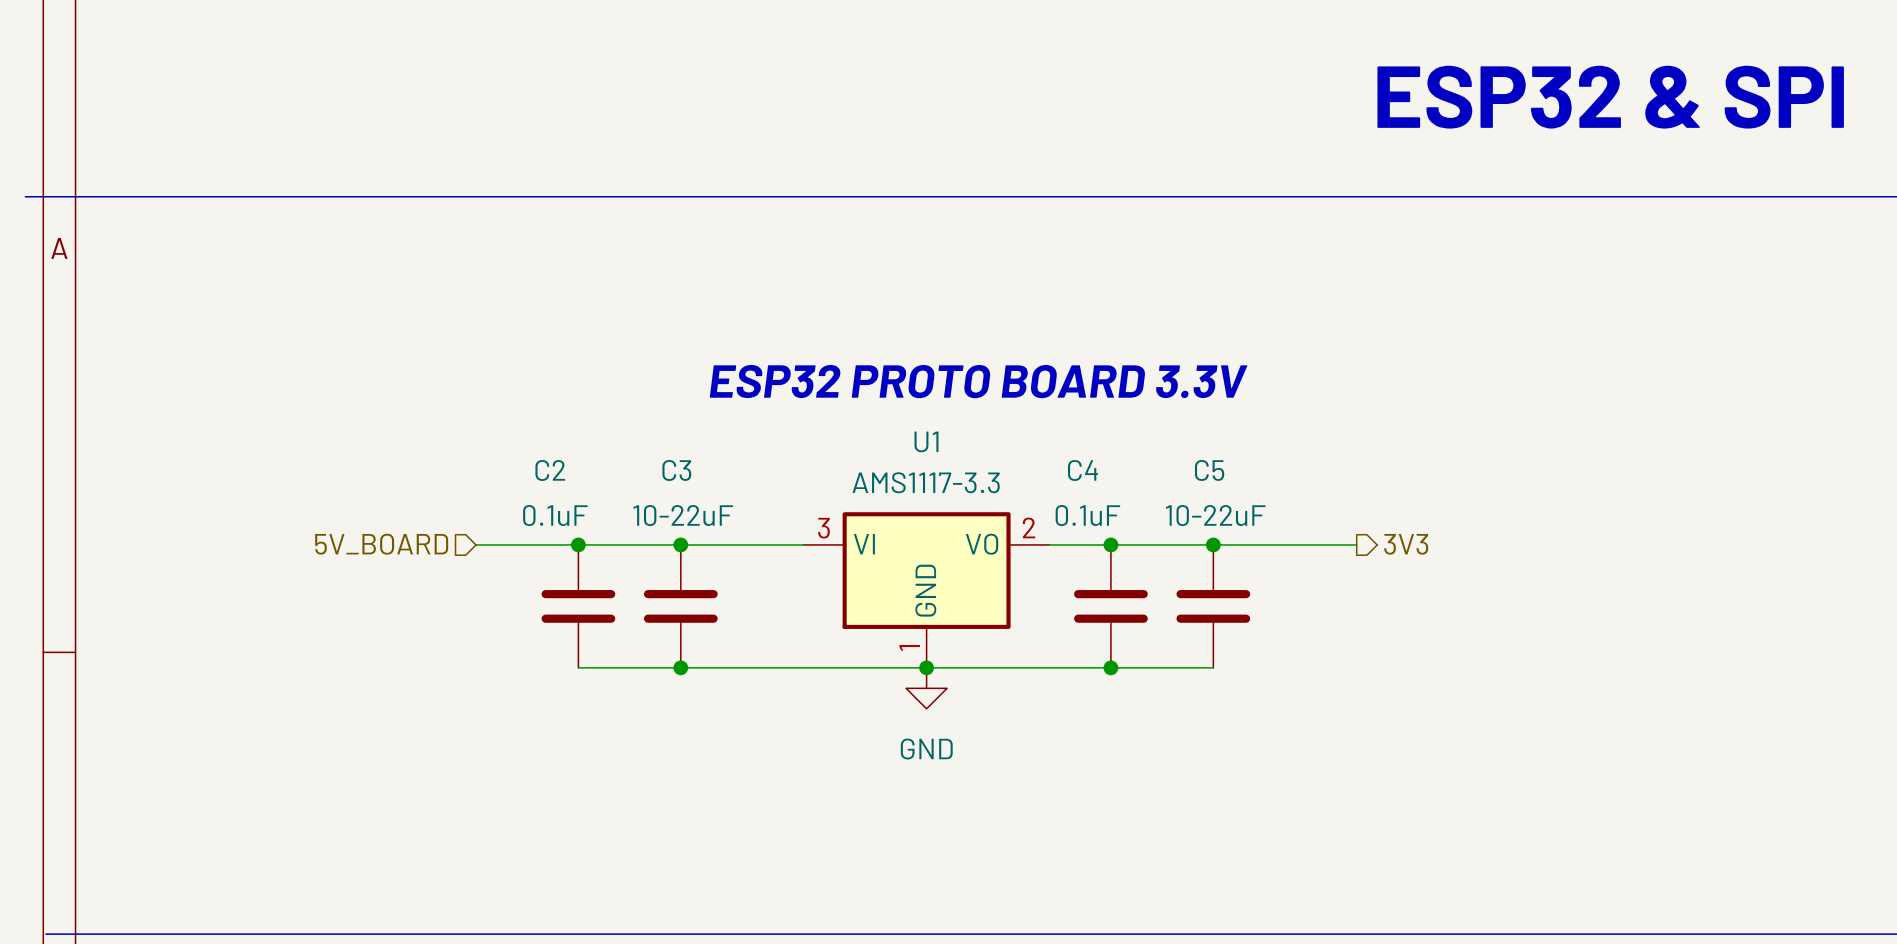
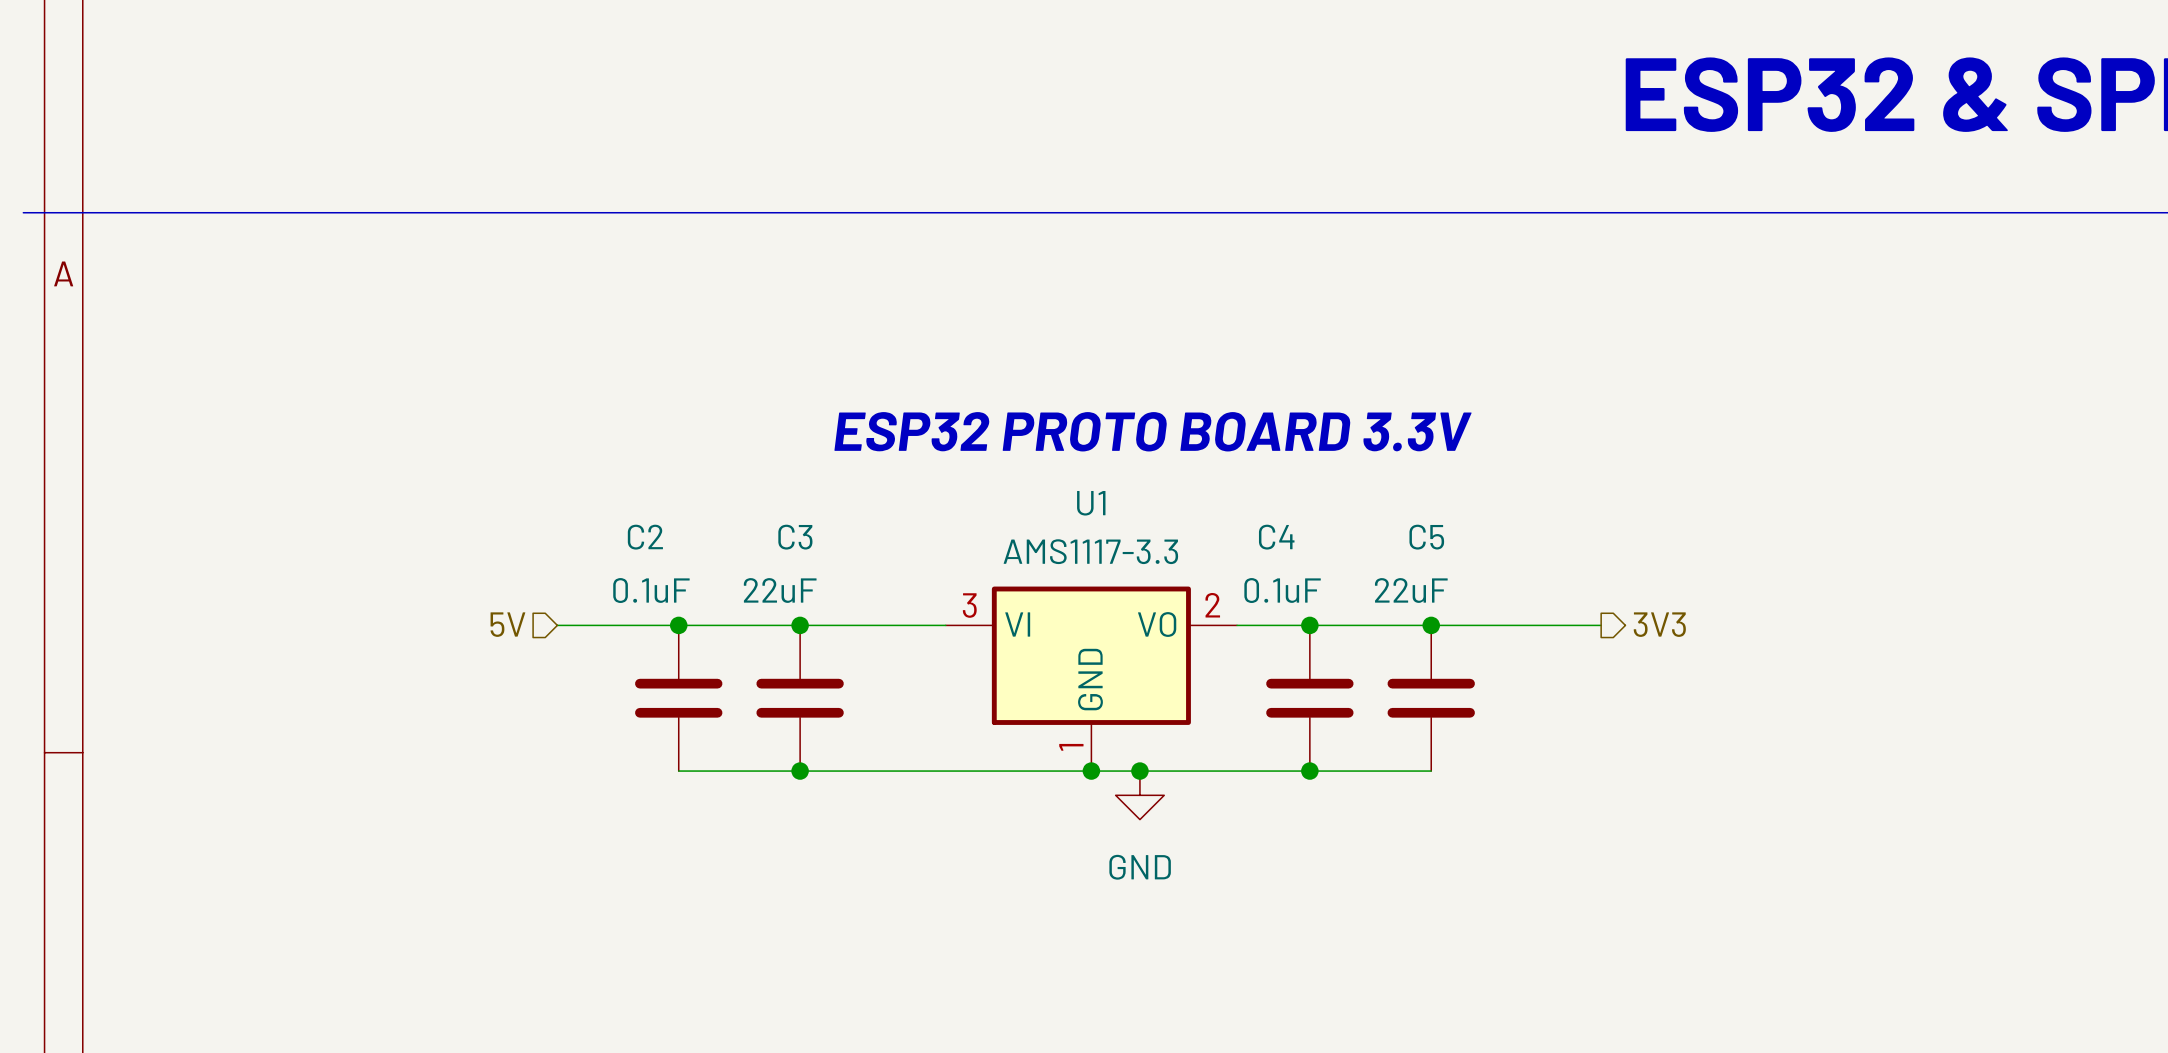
C3 value: 10-22uF (683, 515) -> 22uF (780, 590)
C5 value: 10-22uF (1215, 515) -> 22uF (1411, 590)
hierarchical label: 5V_BOARD (381, 544) -> 5V (507, 624)
junction: none -> (1139, 771)
power symbol position: GND (926, 688) -> GND (1139, 795)

